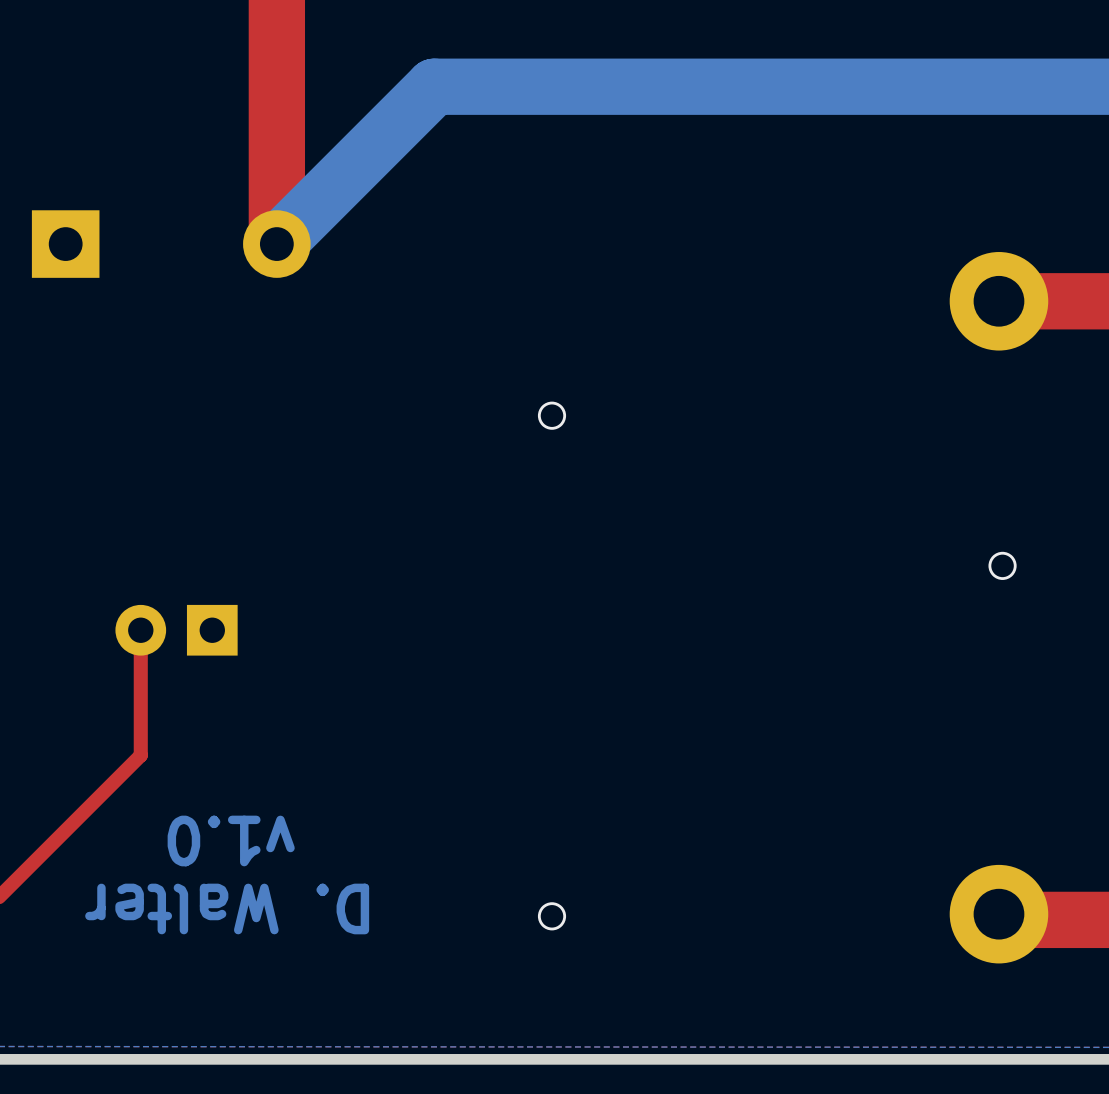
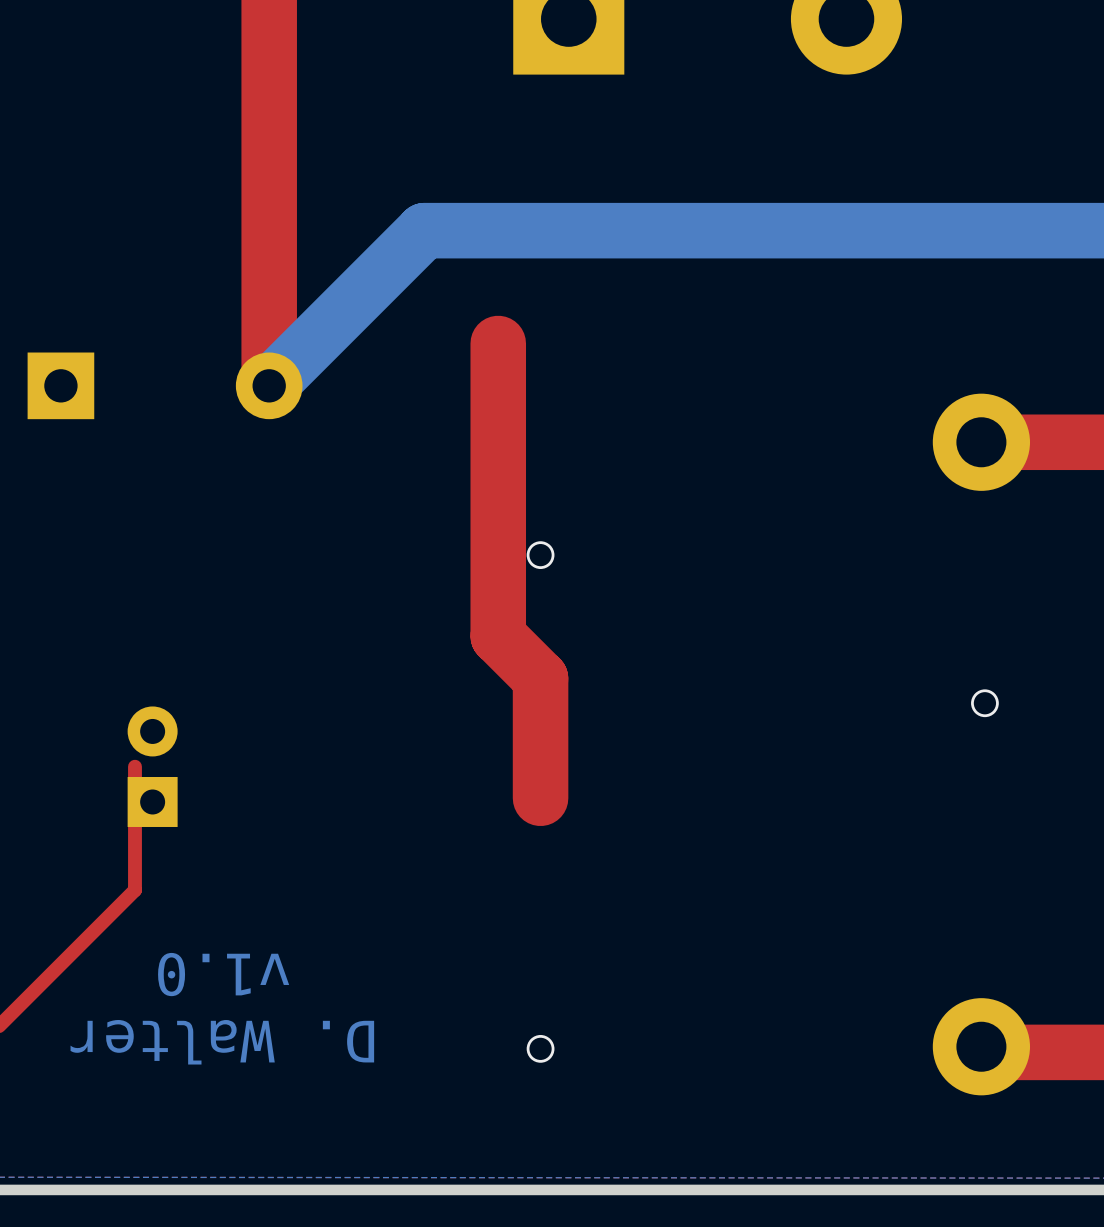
top track: none -> (498, 343) (498, 636) (540, 678) (540, 798)
part rotation: 0° (176, 630) -> 90° clockwise (152, 766)

